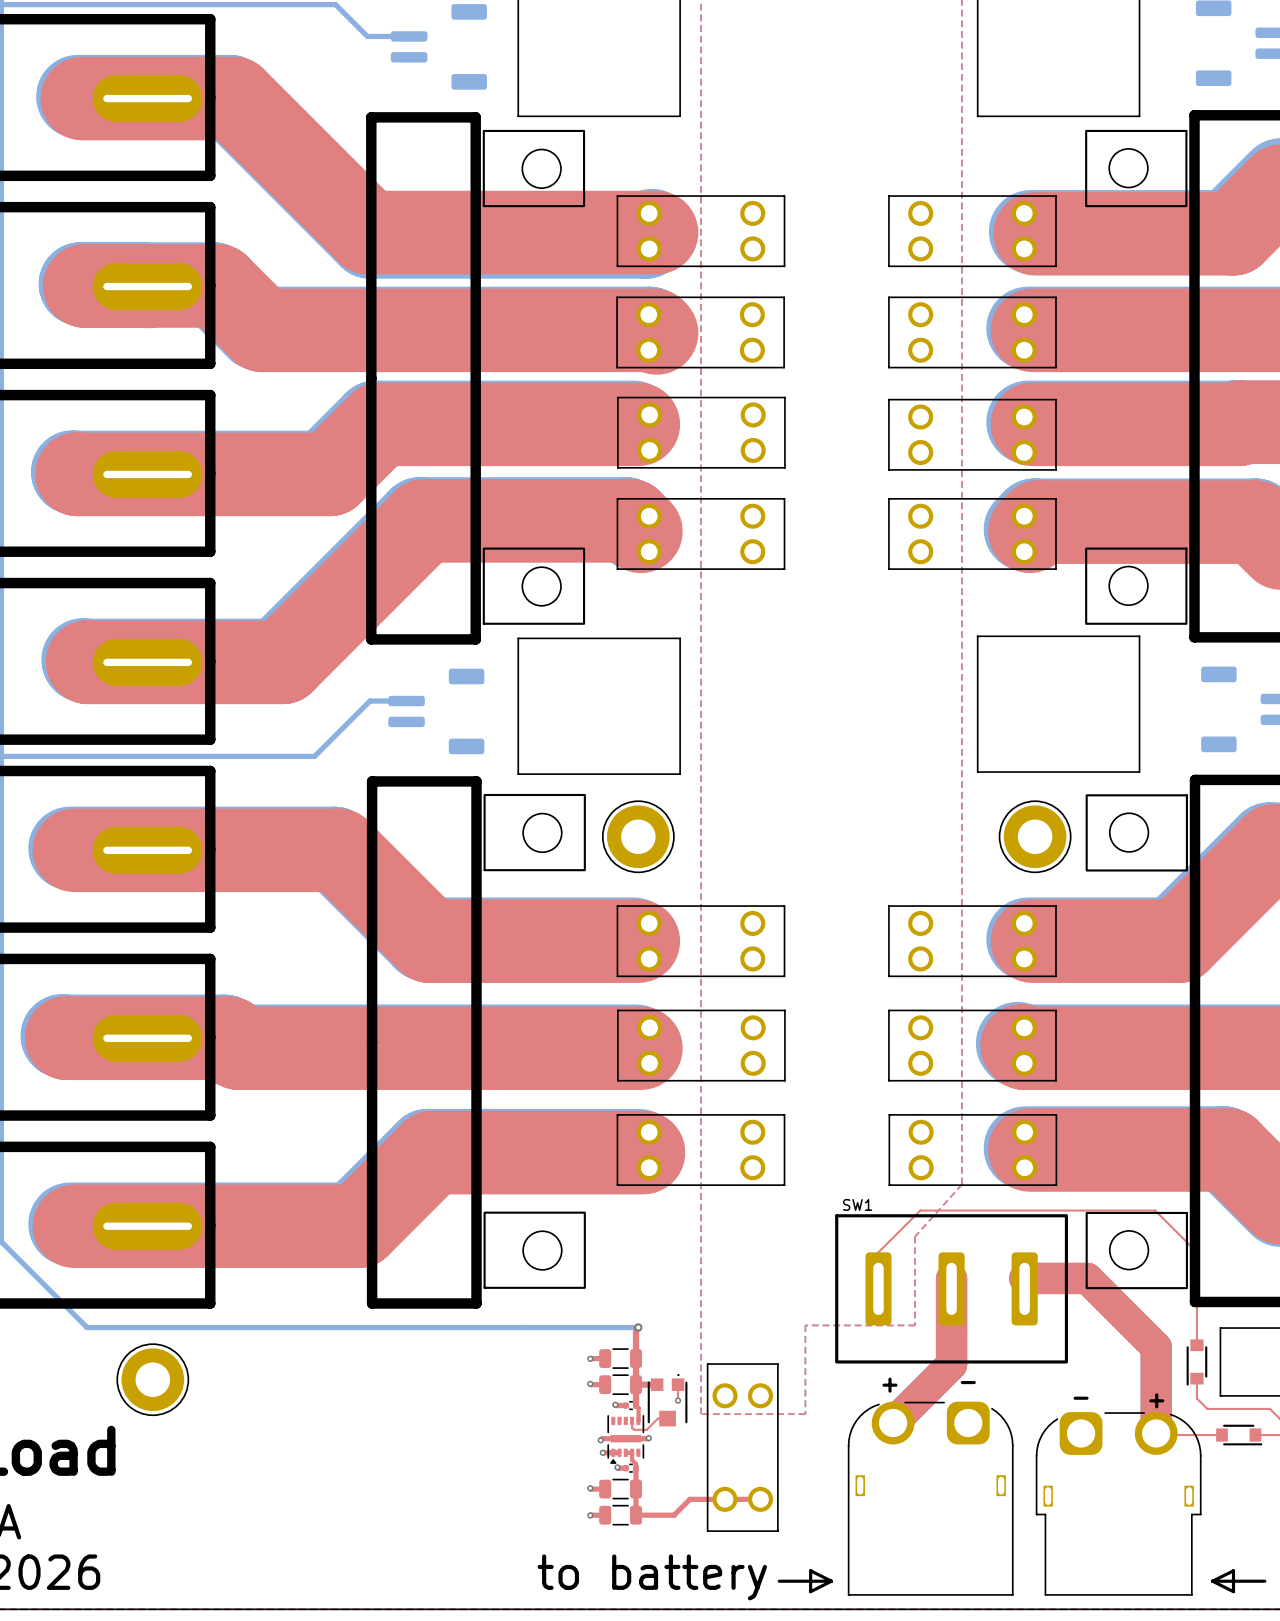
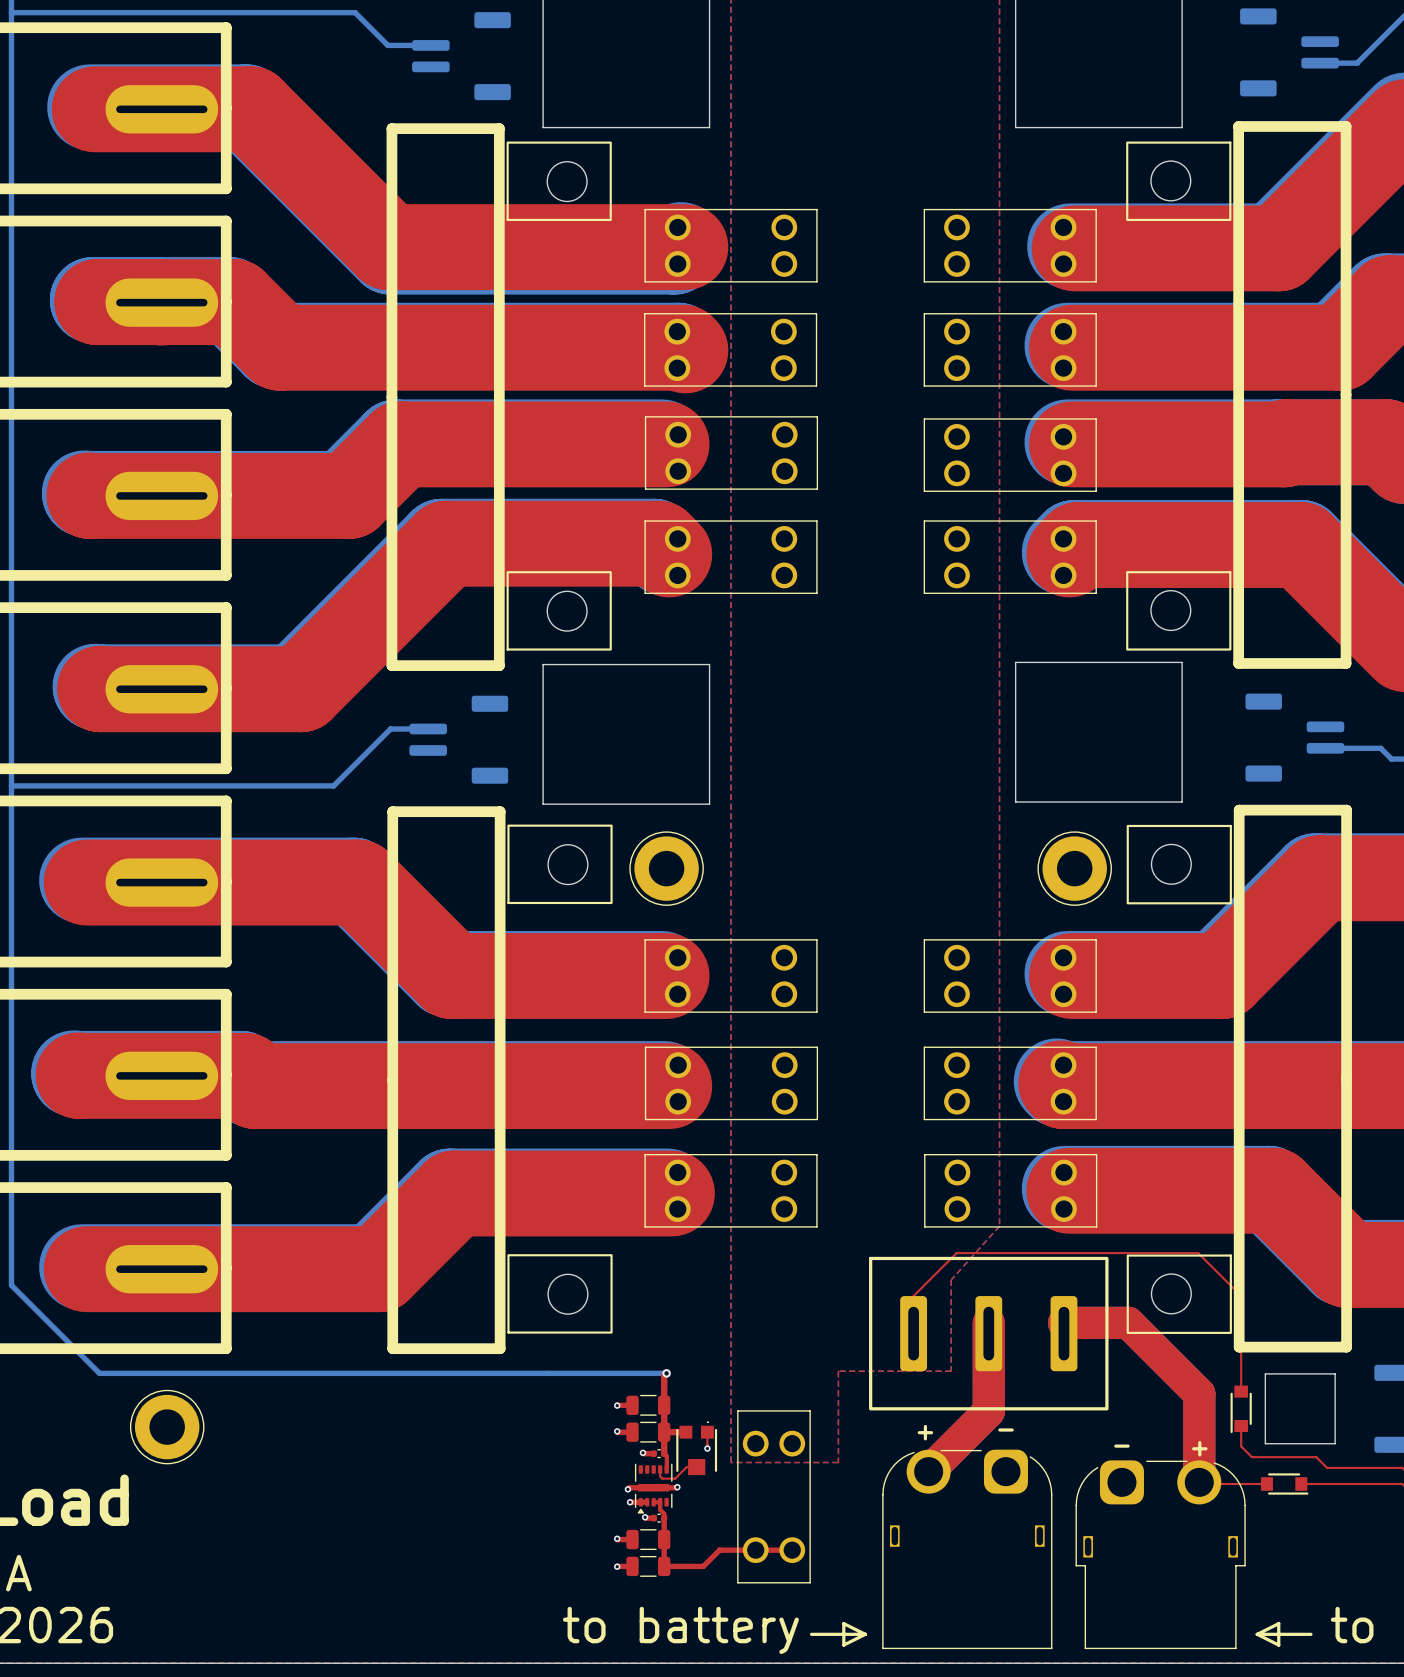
SW1 name: SW1 (857, 1204) -> none

